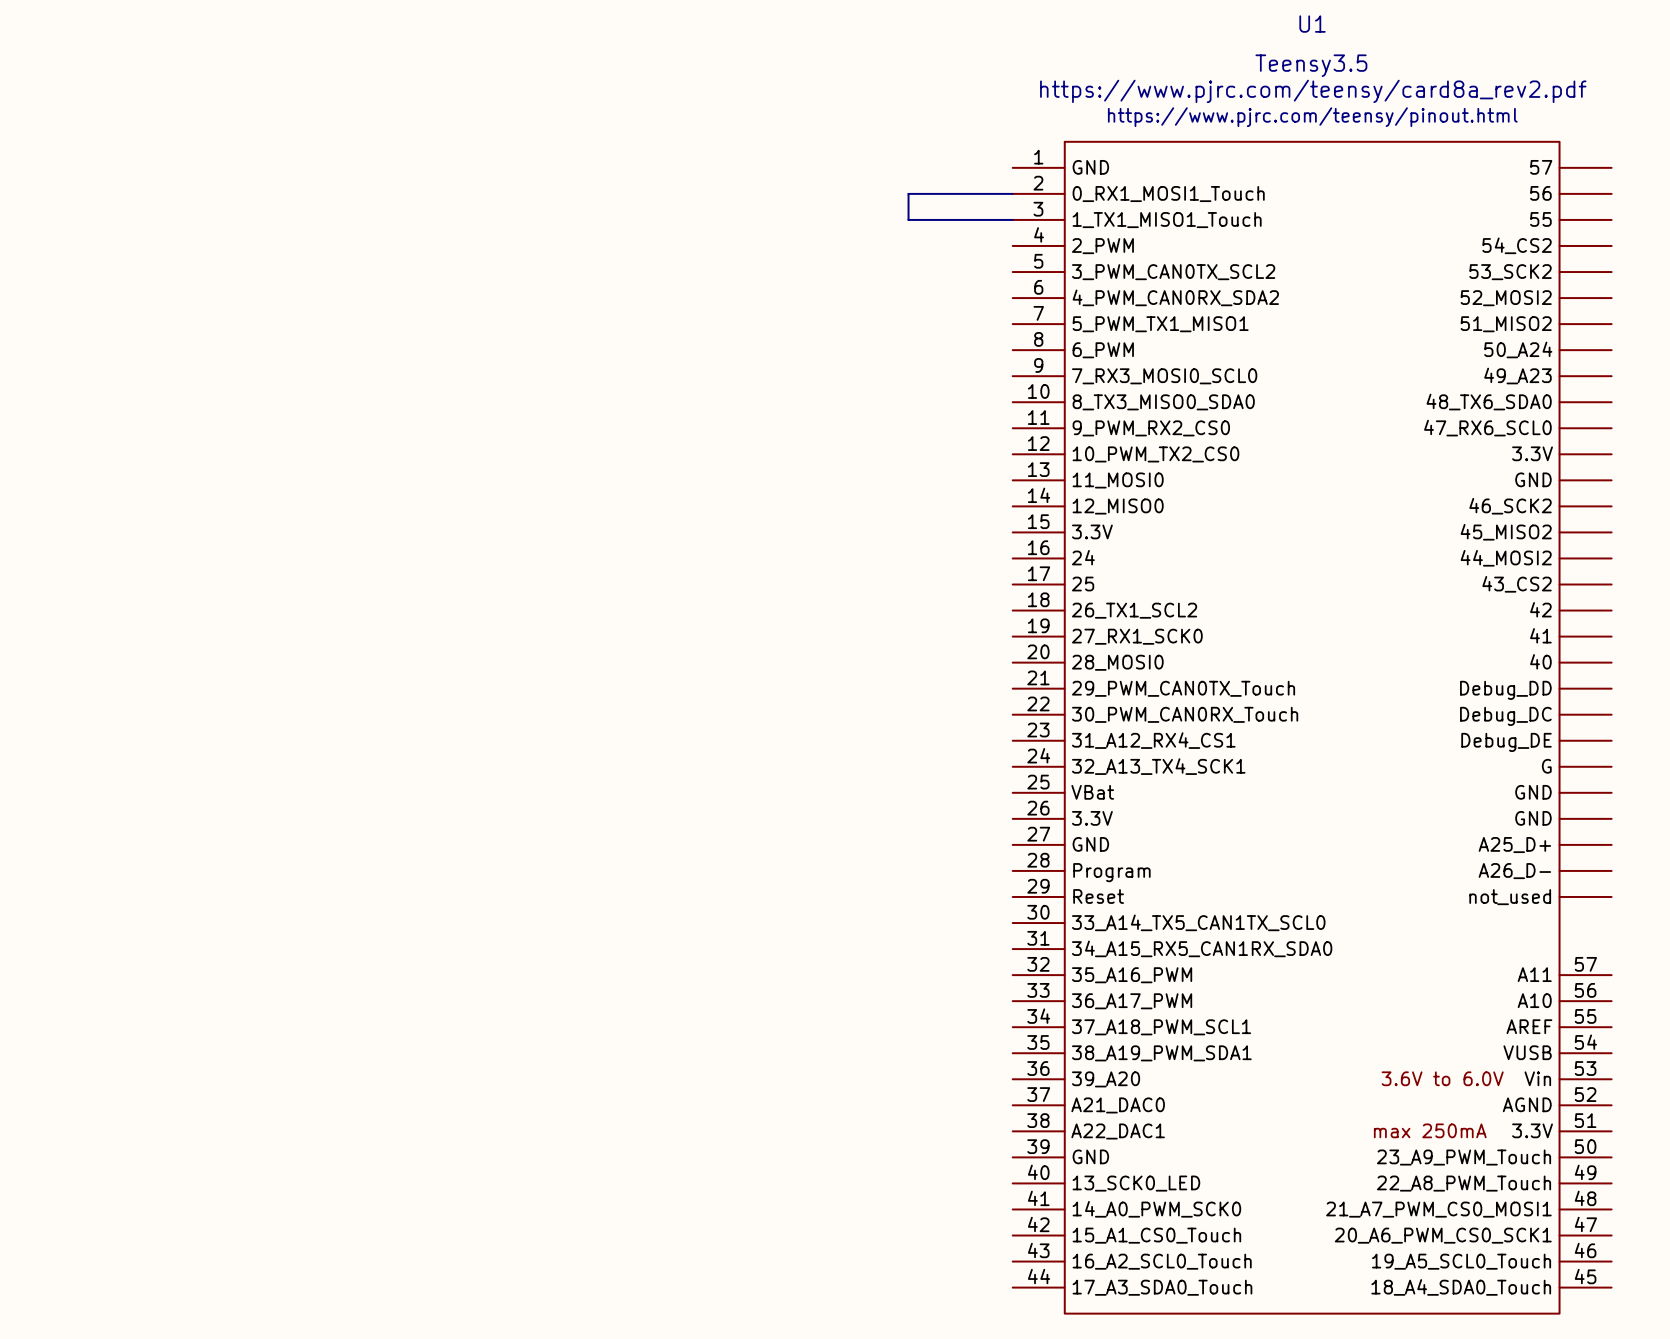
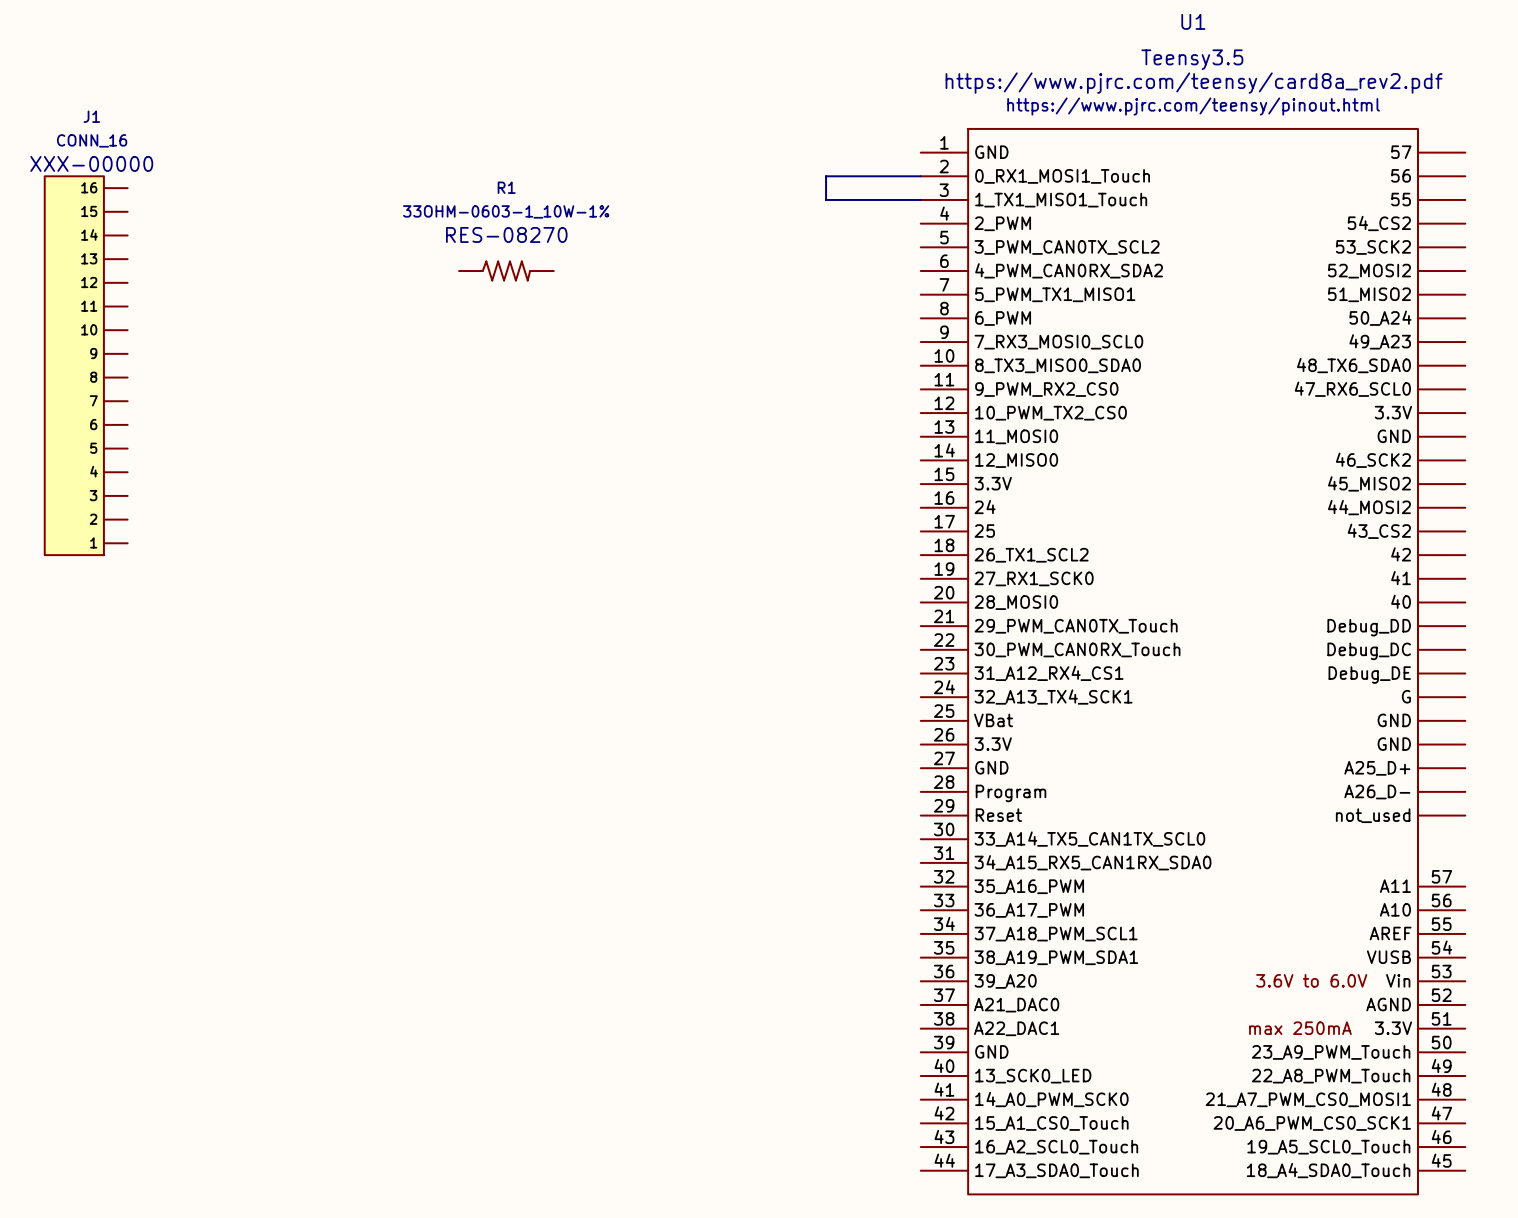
R1: none -> 33OHM-0603-1_10W-1% (506, 271)
J1: none -> CONN_16 (86, 365)

